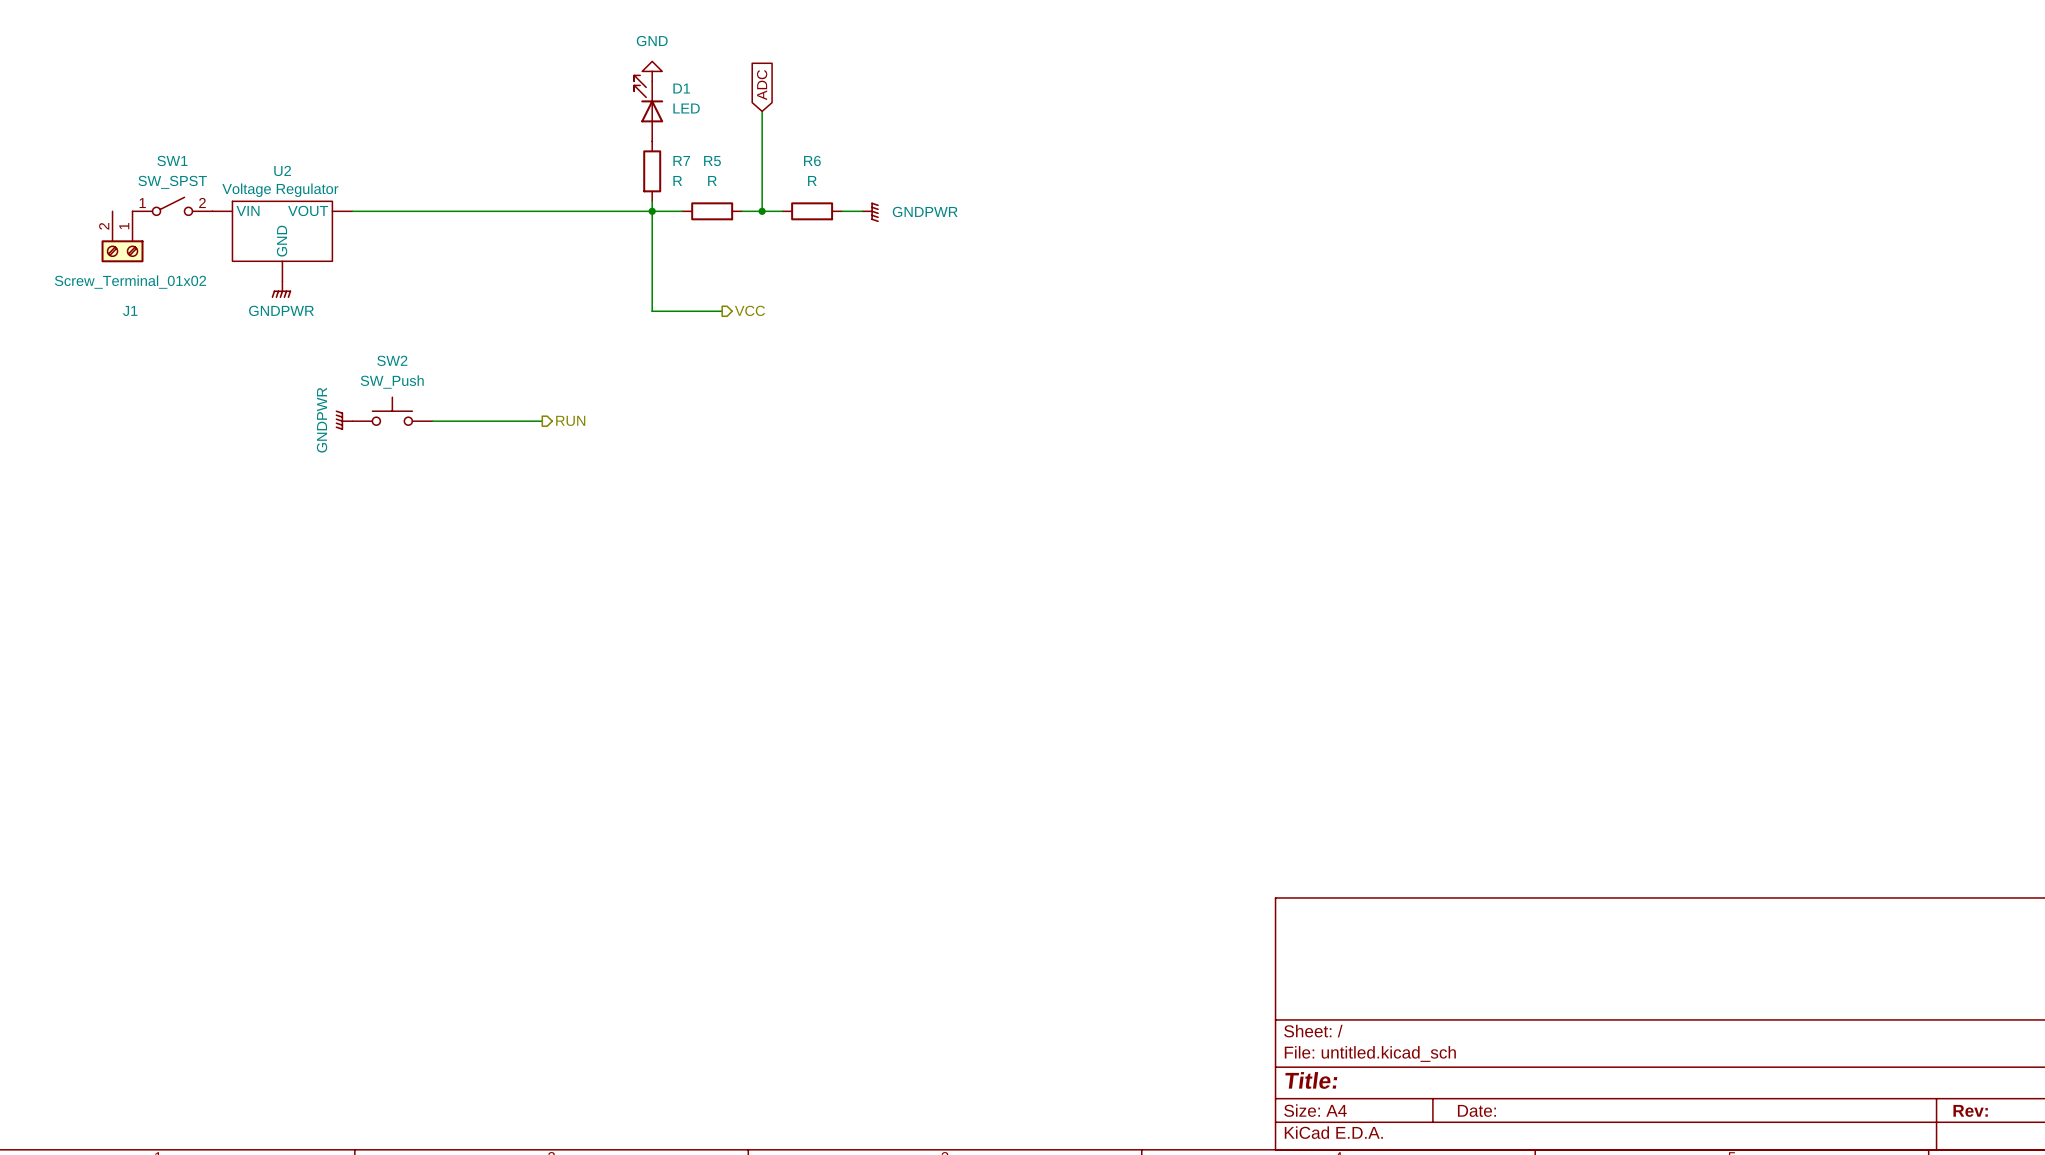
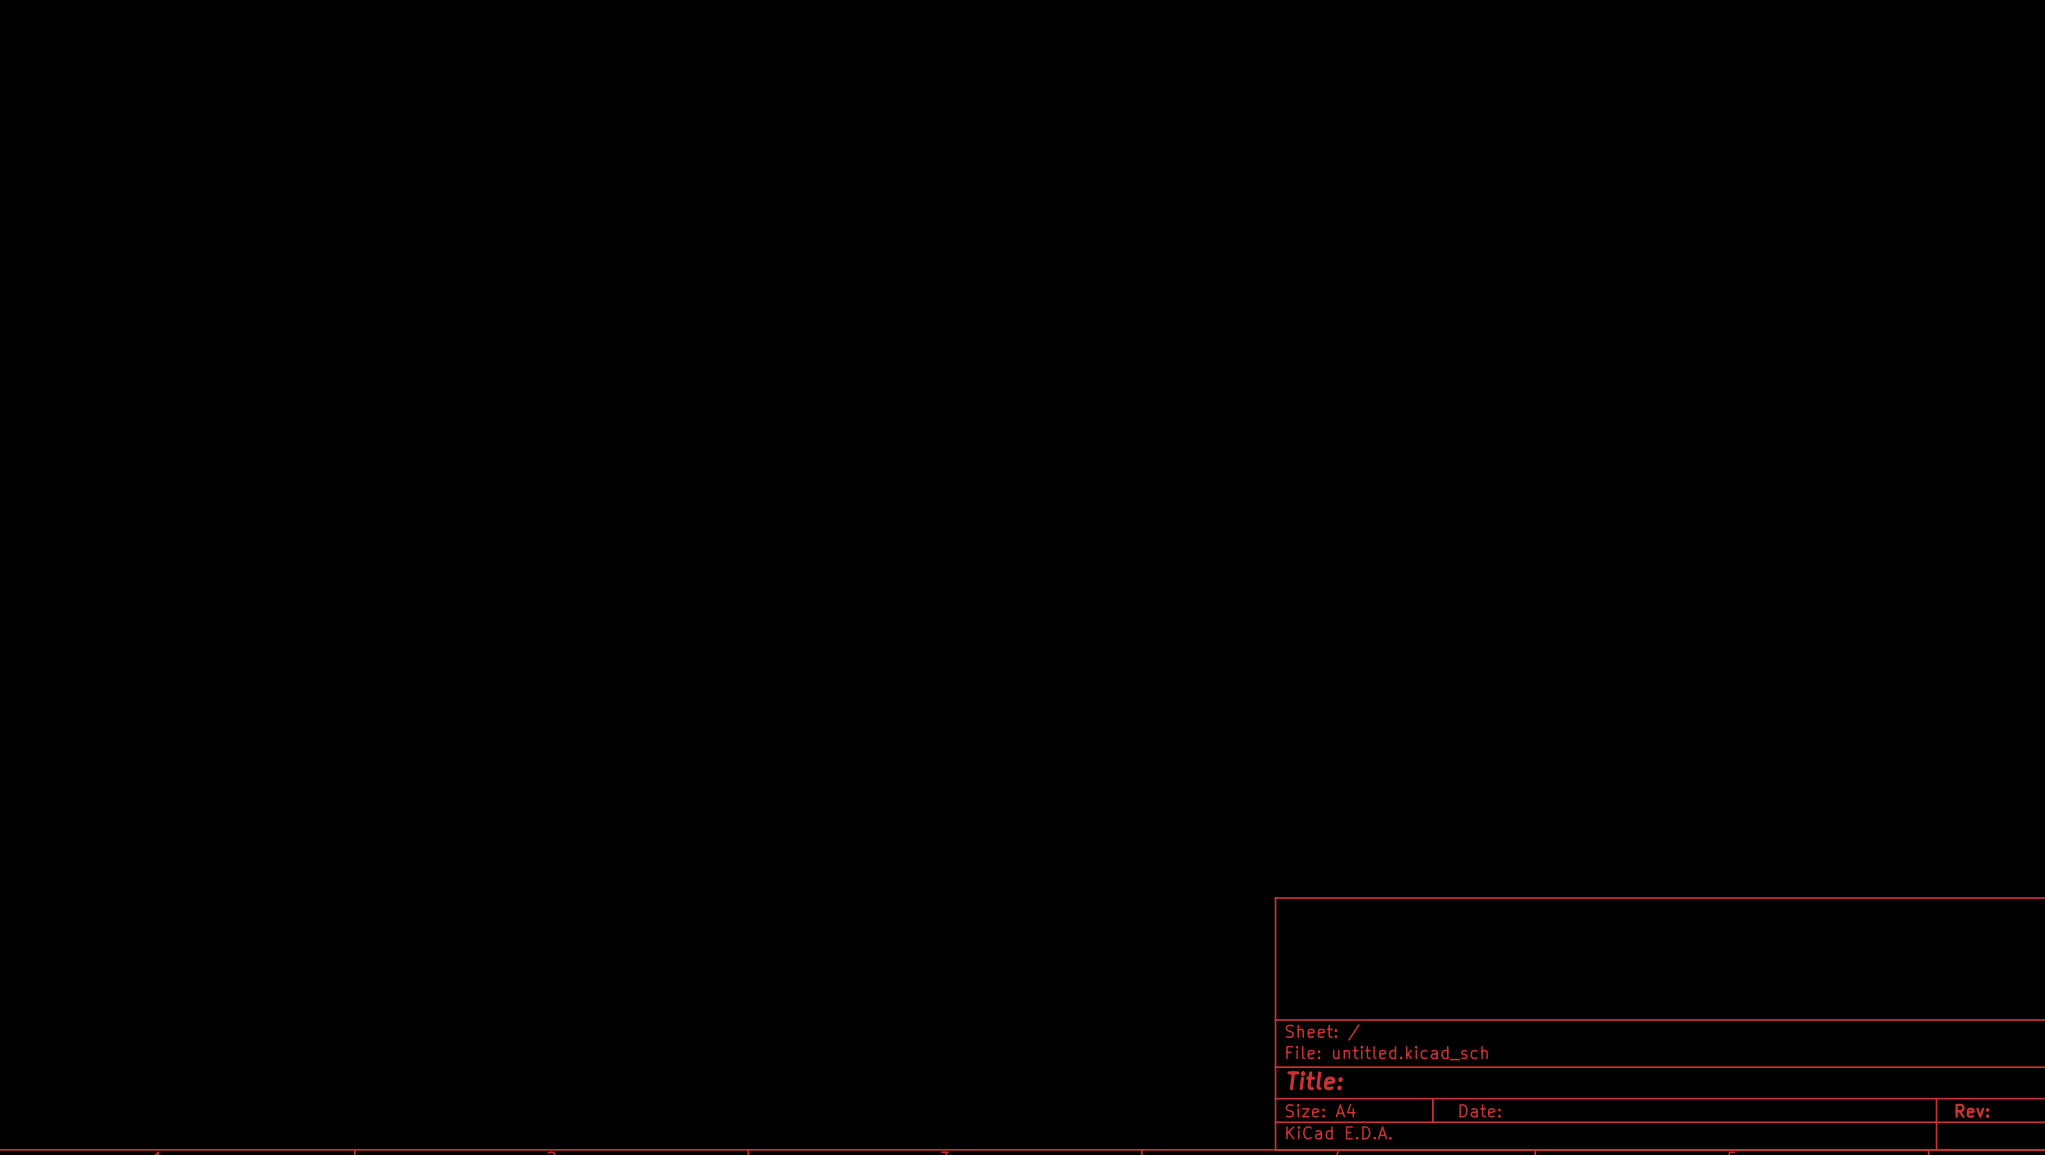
power symbol: GND (652, 71) -> none
global label: ADC (762, 85) -> none
D1: LED (648, 108) -> none
wire: (762, 111) (762, 211) -> none
R7: R (652, 171) -> none
wire: (652, 201) (652, 311) (722, 311) -> none
SW1: SW_SPST (172, 206) -> none
wire: (352, 211) (682, 211) -> none
junction: (652, 211) -> none
R5: R (712, 211) -> none
wire: (742, 211) (782, 211) -> none
junction: (762, 211) -> none
R6: R (812, 211) -> none
wire: (842, 211) (862, 211) -> none
power symbol: GNDPWR (870, 212) -> none
J1: Screw_Terminal_01x02 (122, 236) -> none
U2: Voltage Regulator (282, 241) -> none
power symbol: GNDPWR (281, 289) -> none
hierarchical label: VCC (749, 310) -> none
SW2: SW_Push (392, 411) -> none
power symbol: GNDPWR (343, 420) -> none
hierarchical label: RUN (570, 420) -> none
wire: (432, 421) (542, 421) -> none

